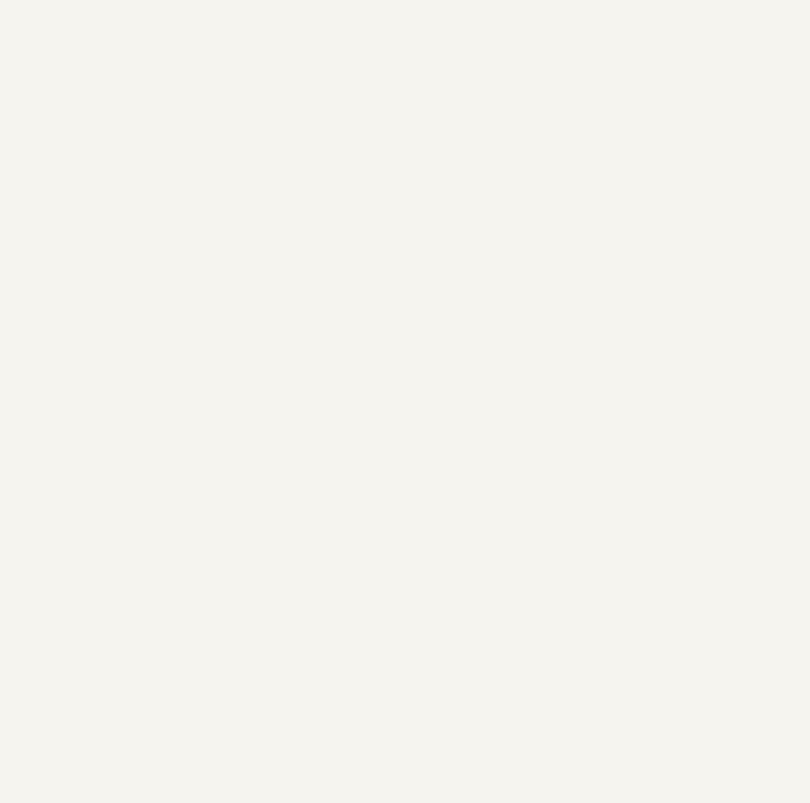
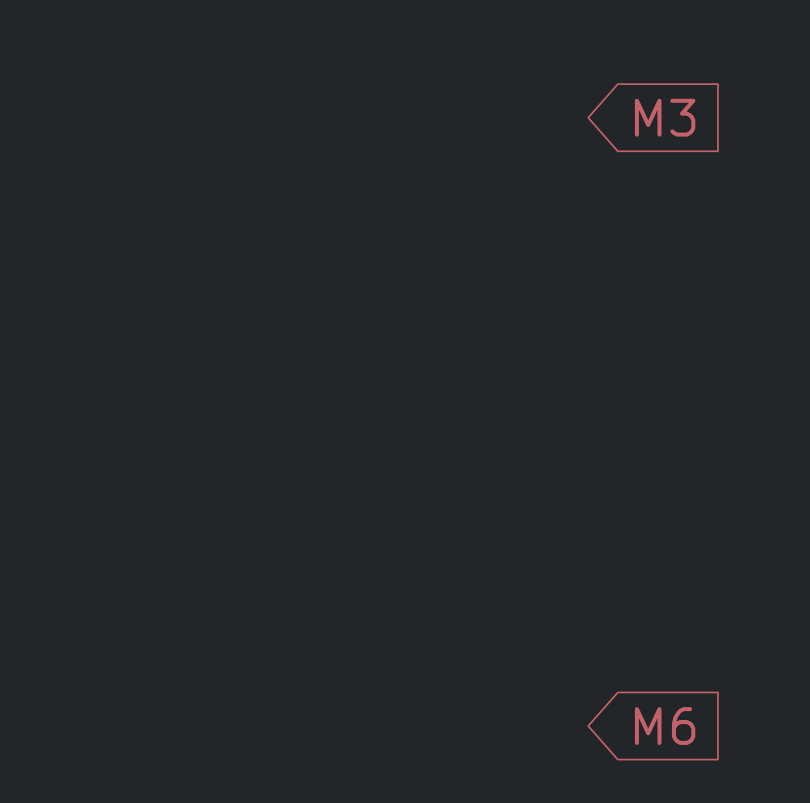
global label: none -> M3 (665, 117)
global label: none -> M6 (665, 726)

